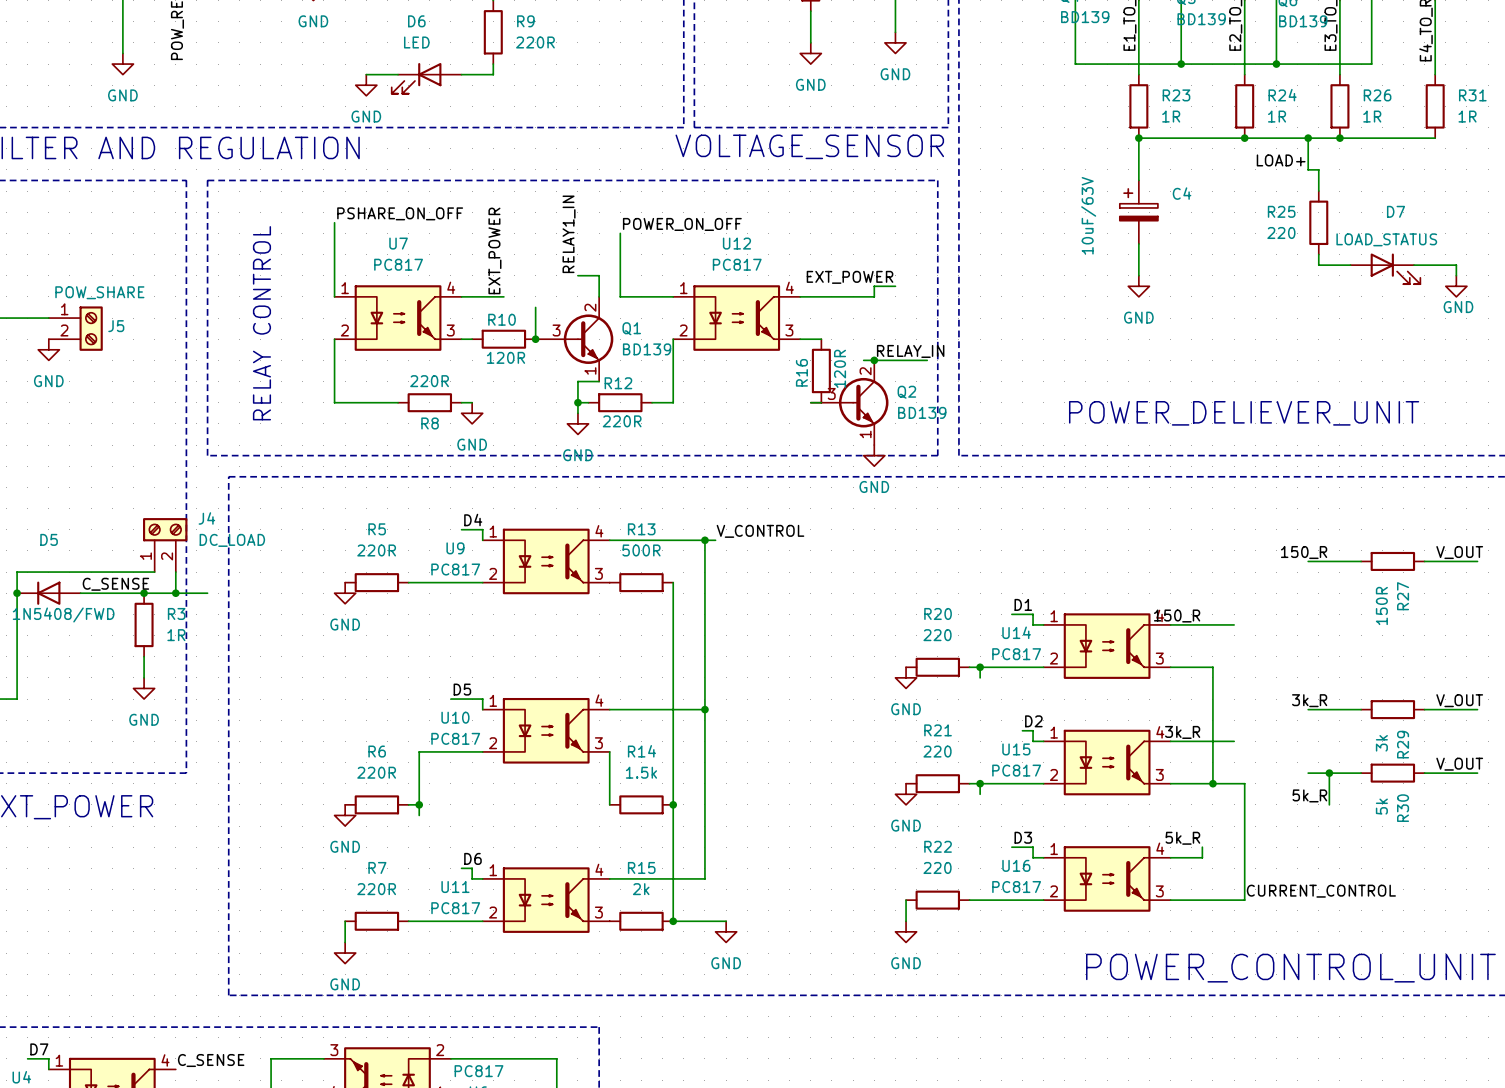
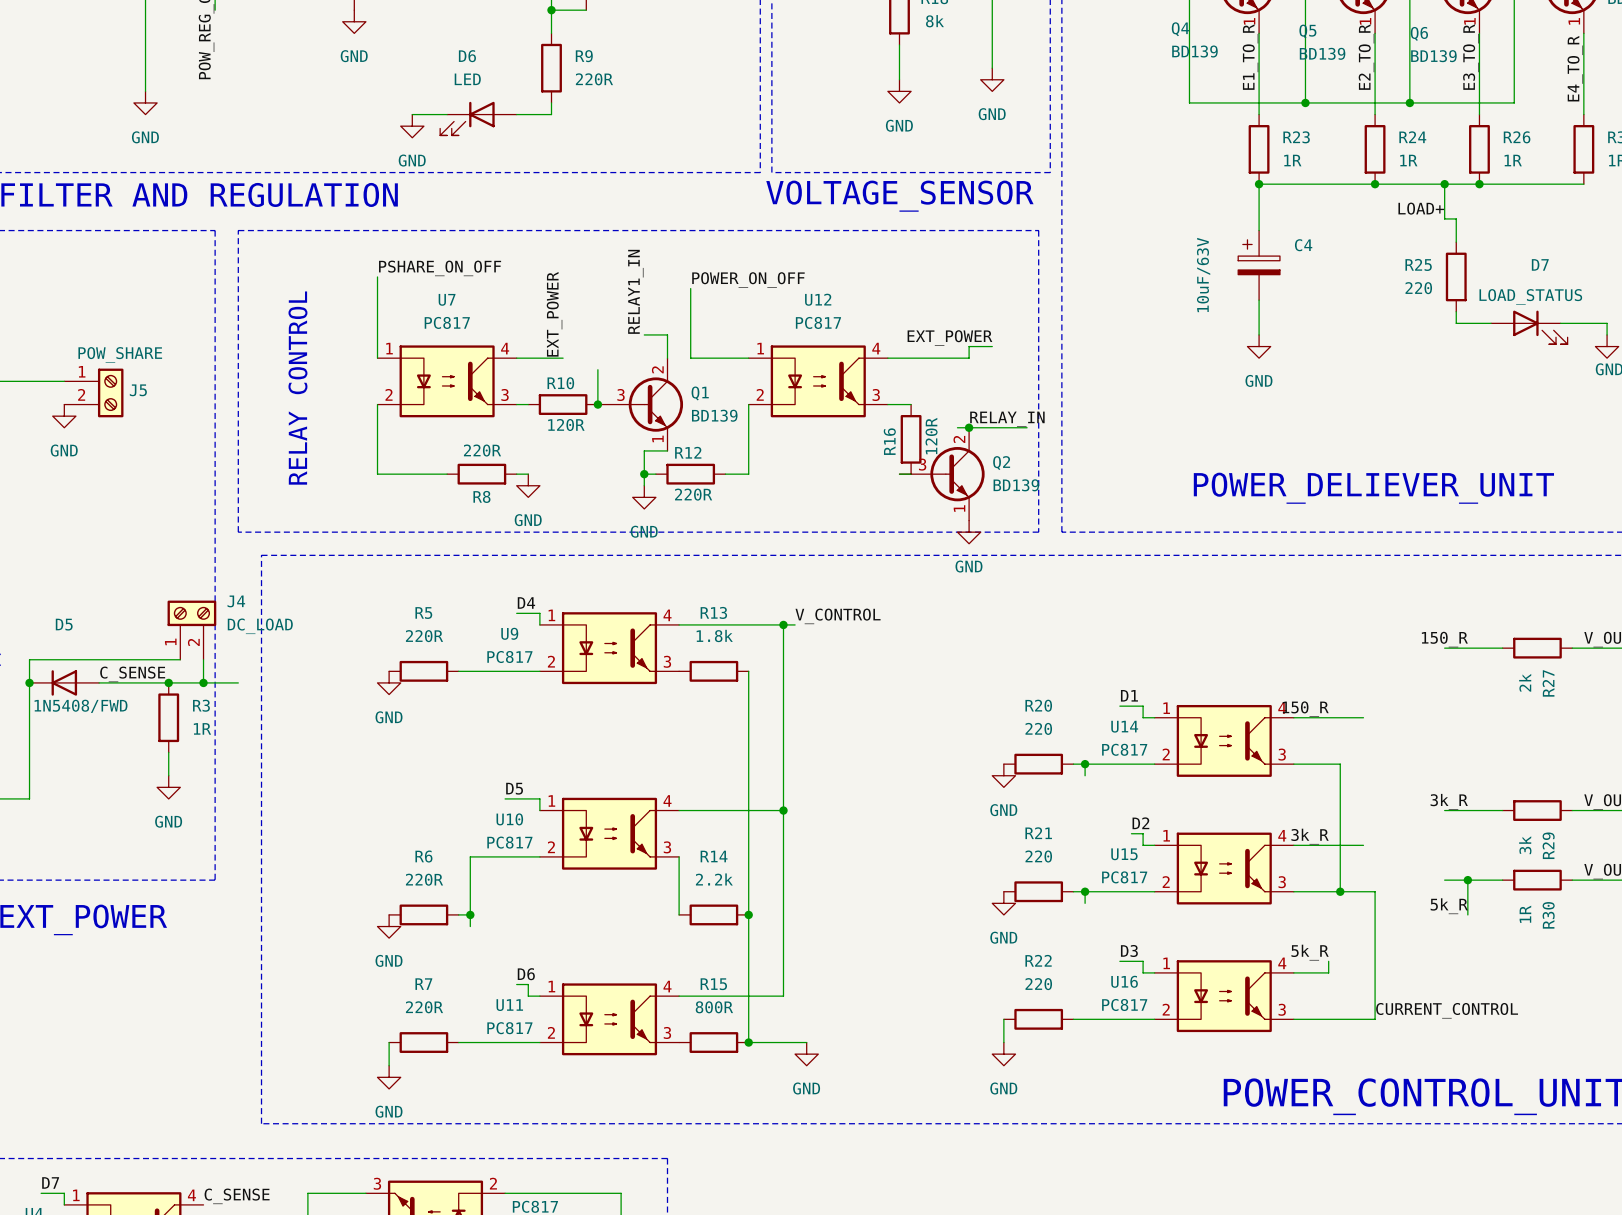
R13 value: 500R (641, 550) -> 1.8k (714, 635)
R27 value: 150R (1381, 605) -> 2k (1525, 682)
R14 value: 1.5k (641, 772) -> 2.2k (714, 879)
R30 value: 5k (1381, 806) -> 1R (1525, 914)
R15 value: 2k (641, 889) -> 800R (714, 1007)

